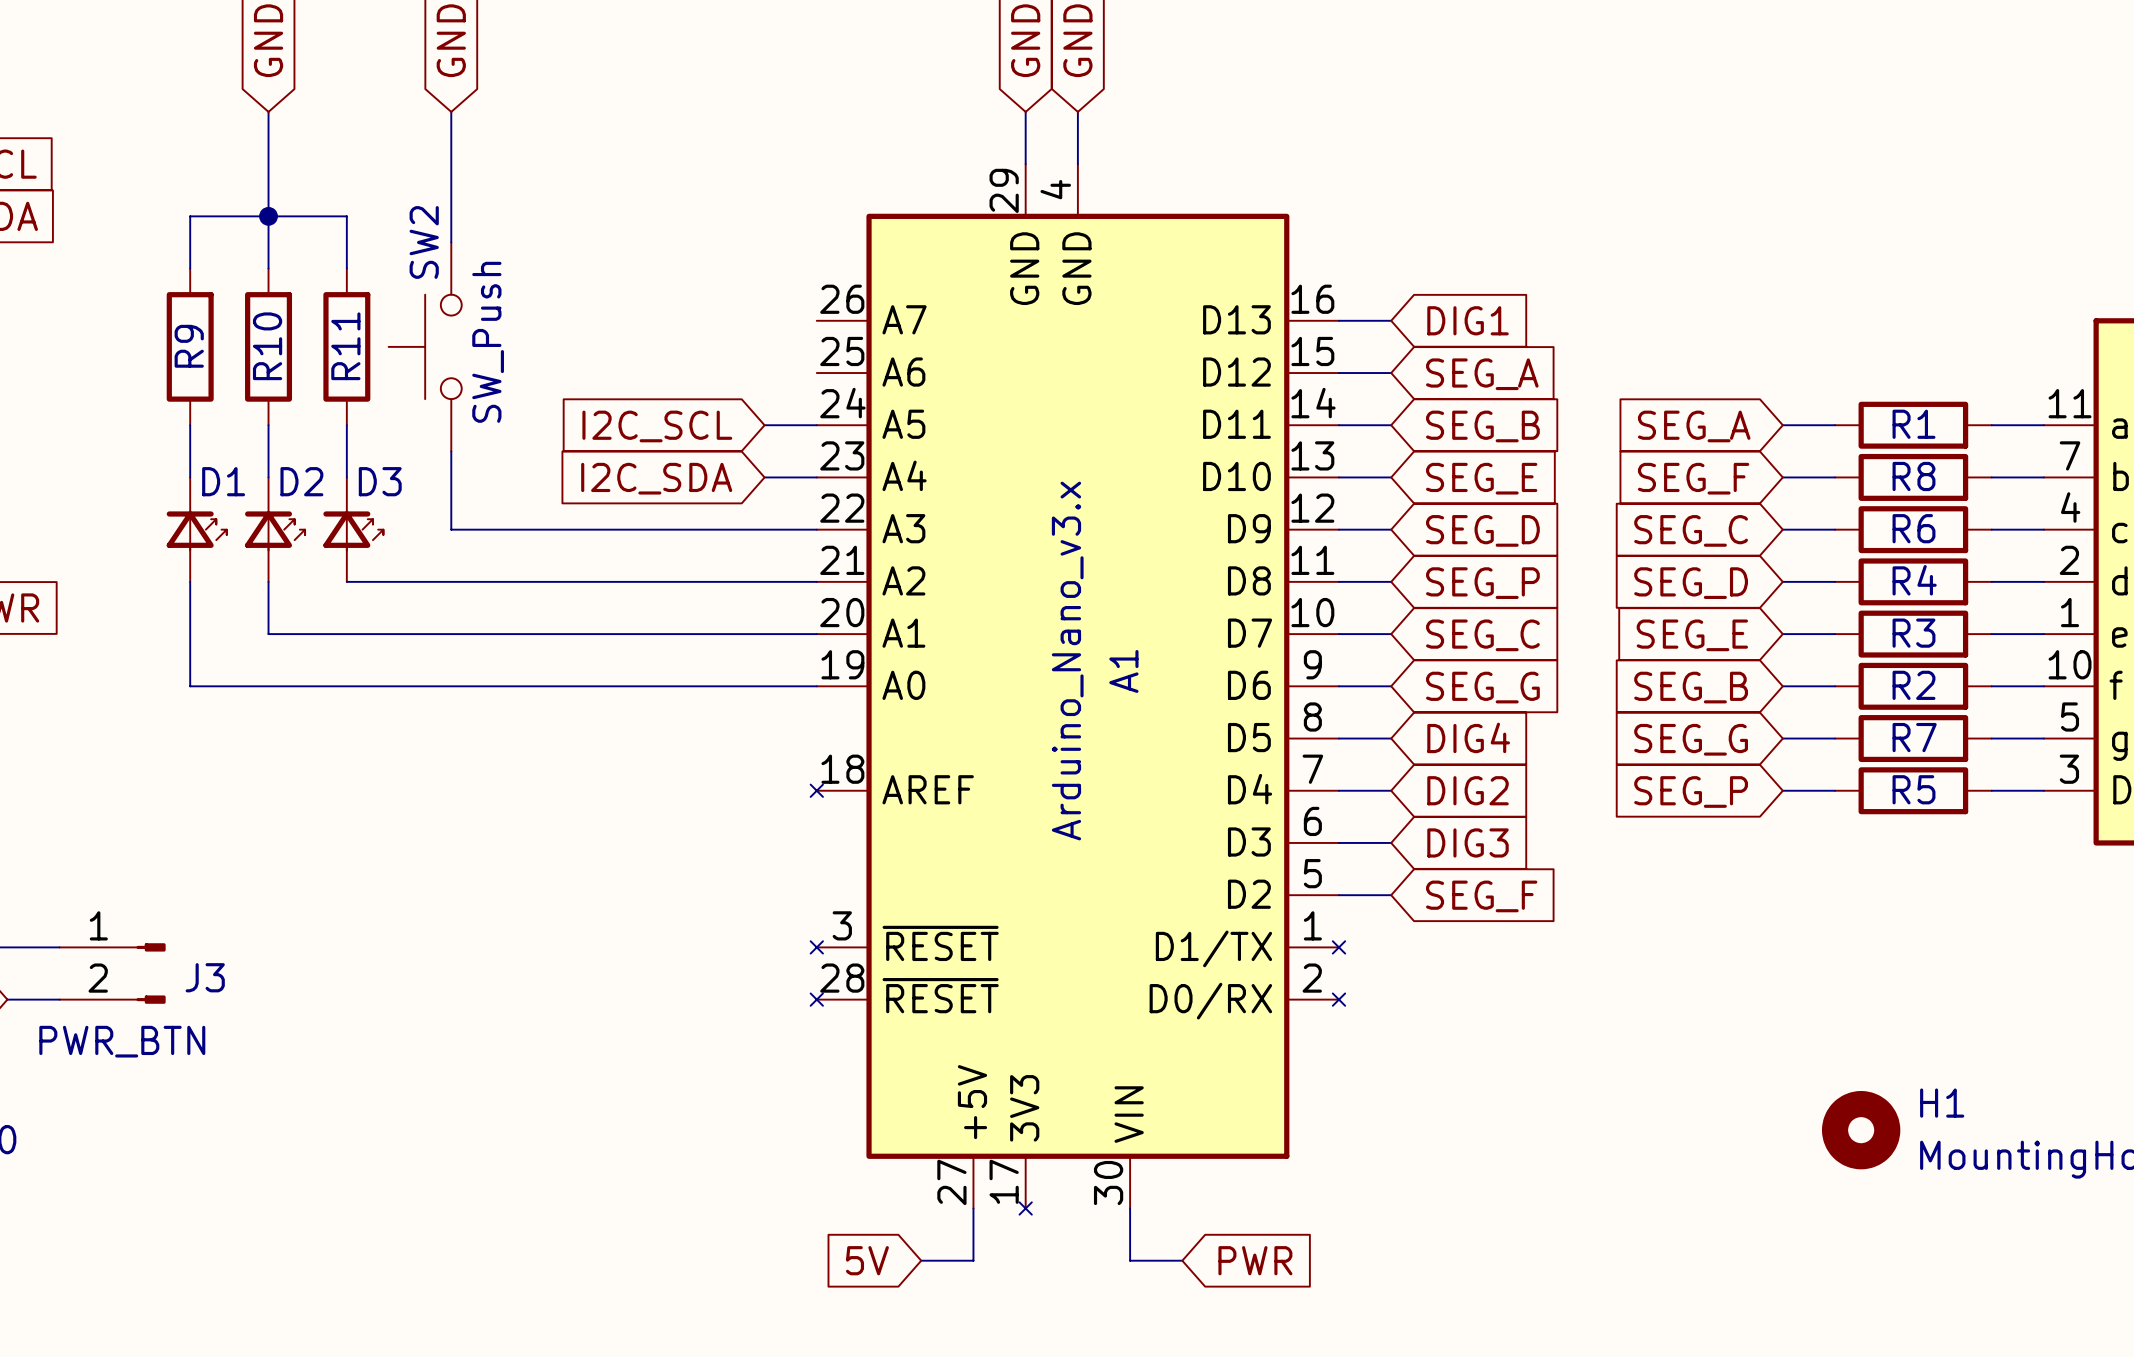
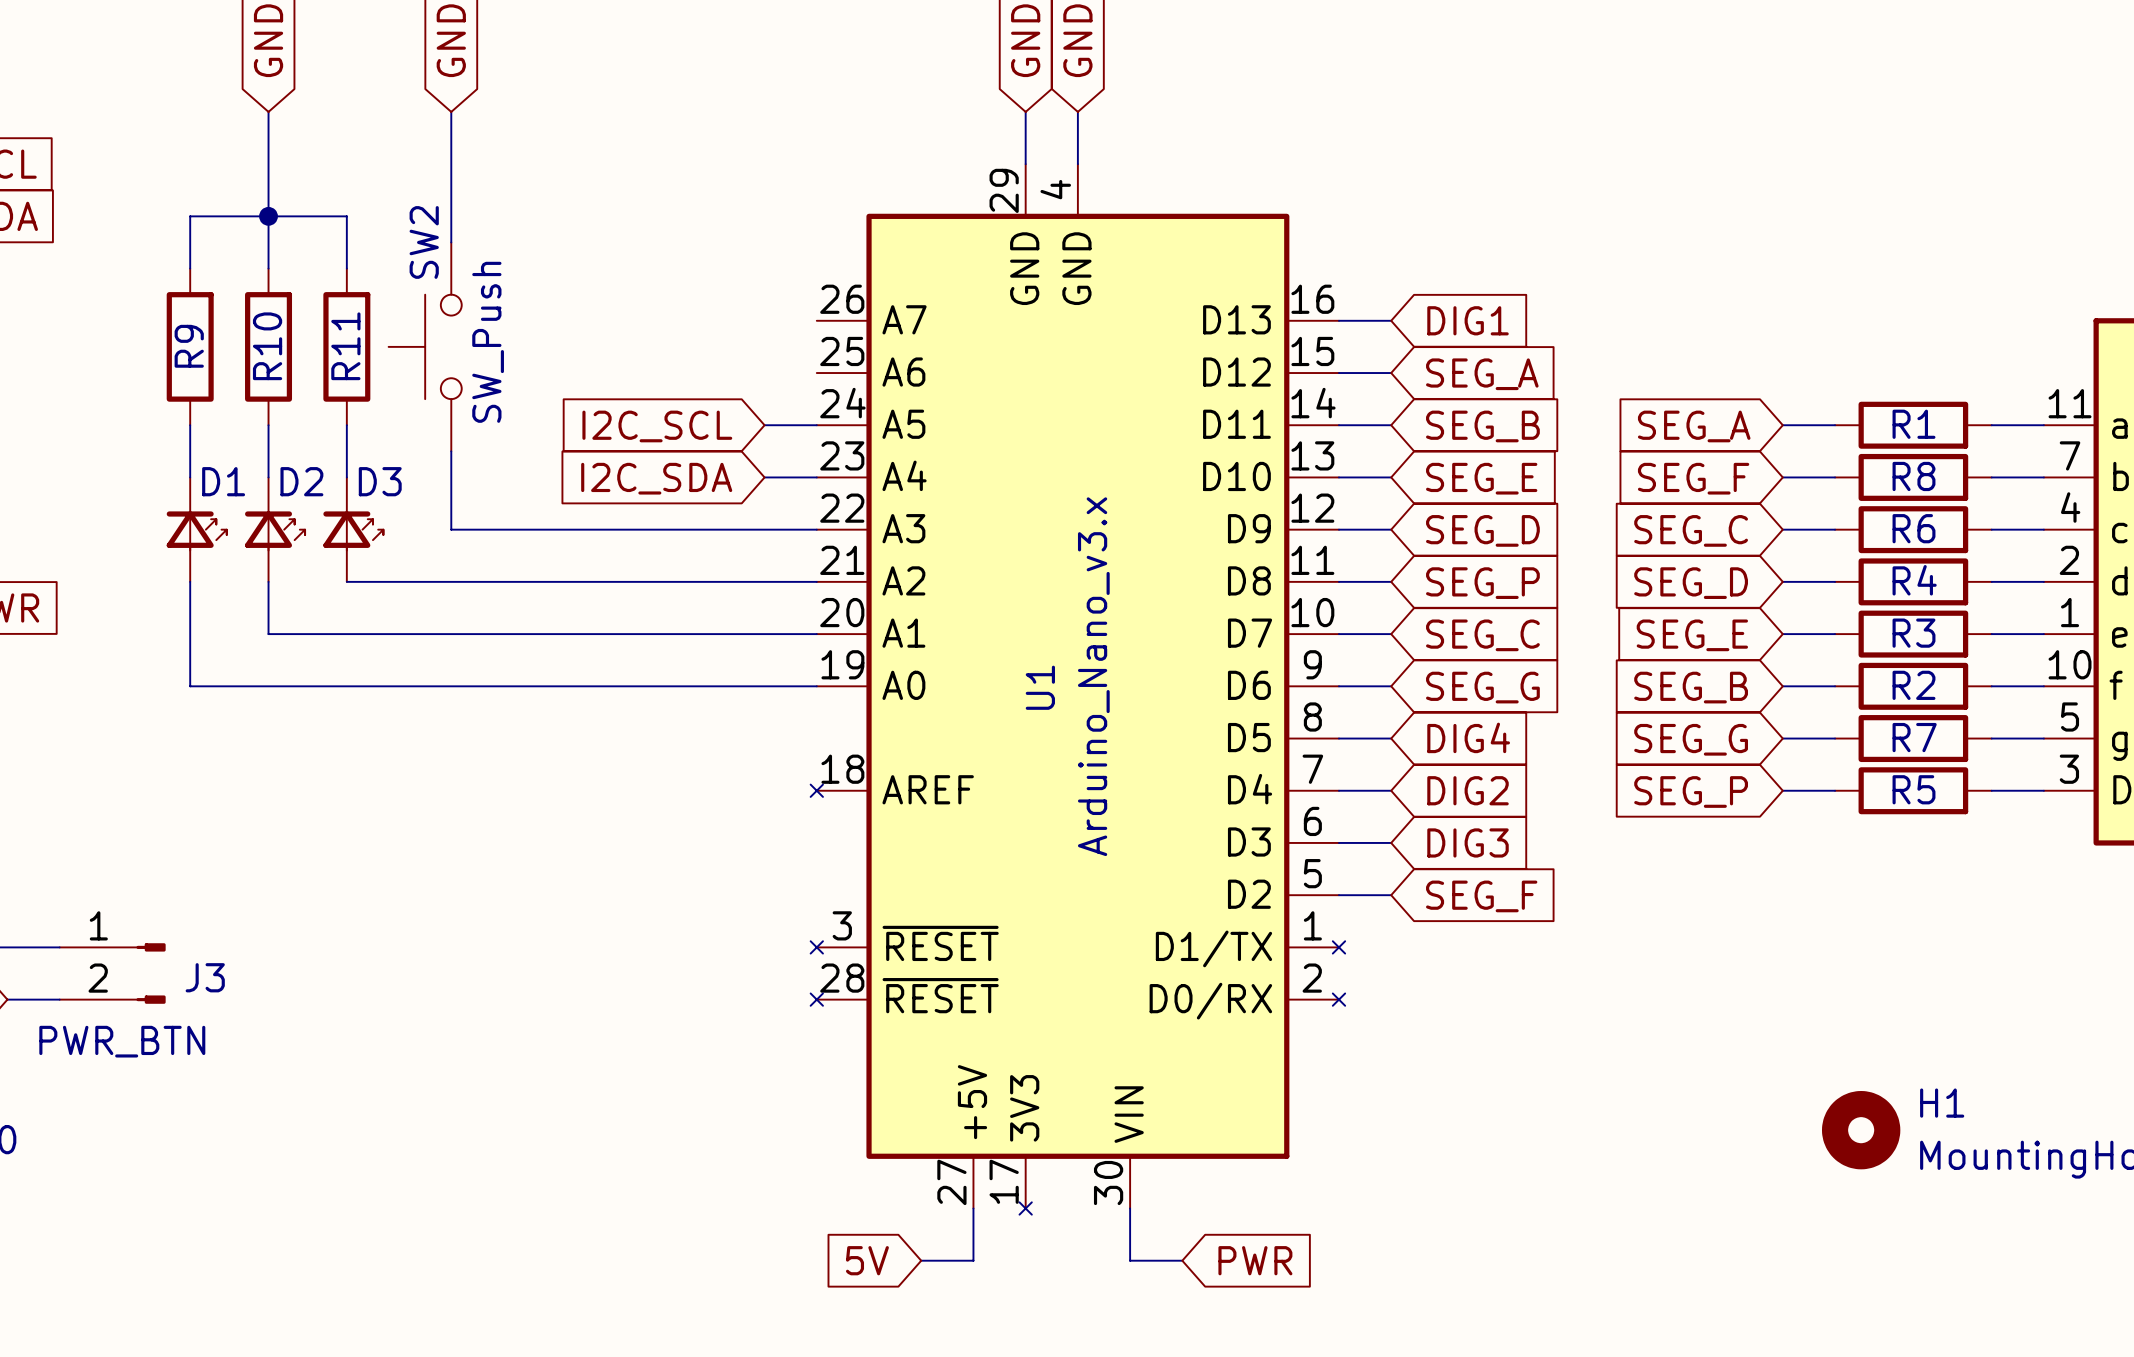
A1 value position: Arduino_Nano_v3.x (1067, 661) -> Arduino_Nano_v3.x (1093, 676)
A1 name: A1 (1123, 671) -> U1 (1040, 687)

